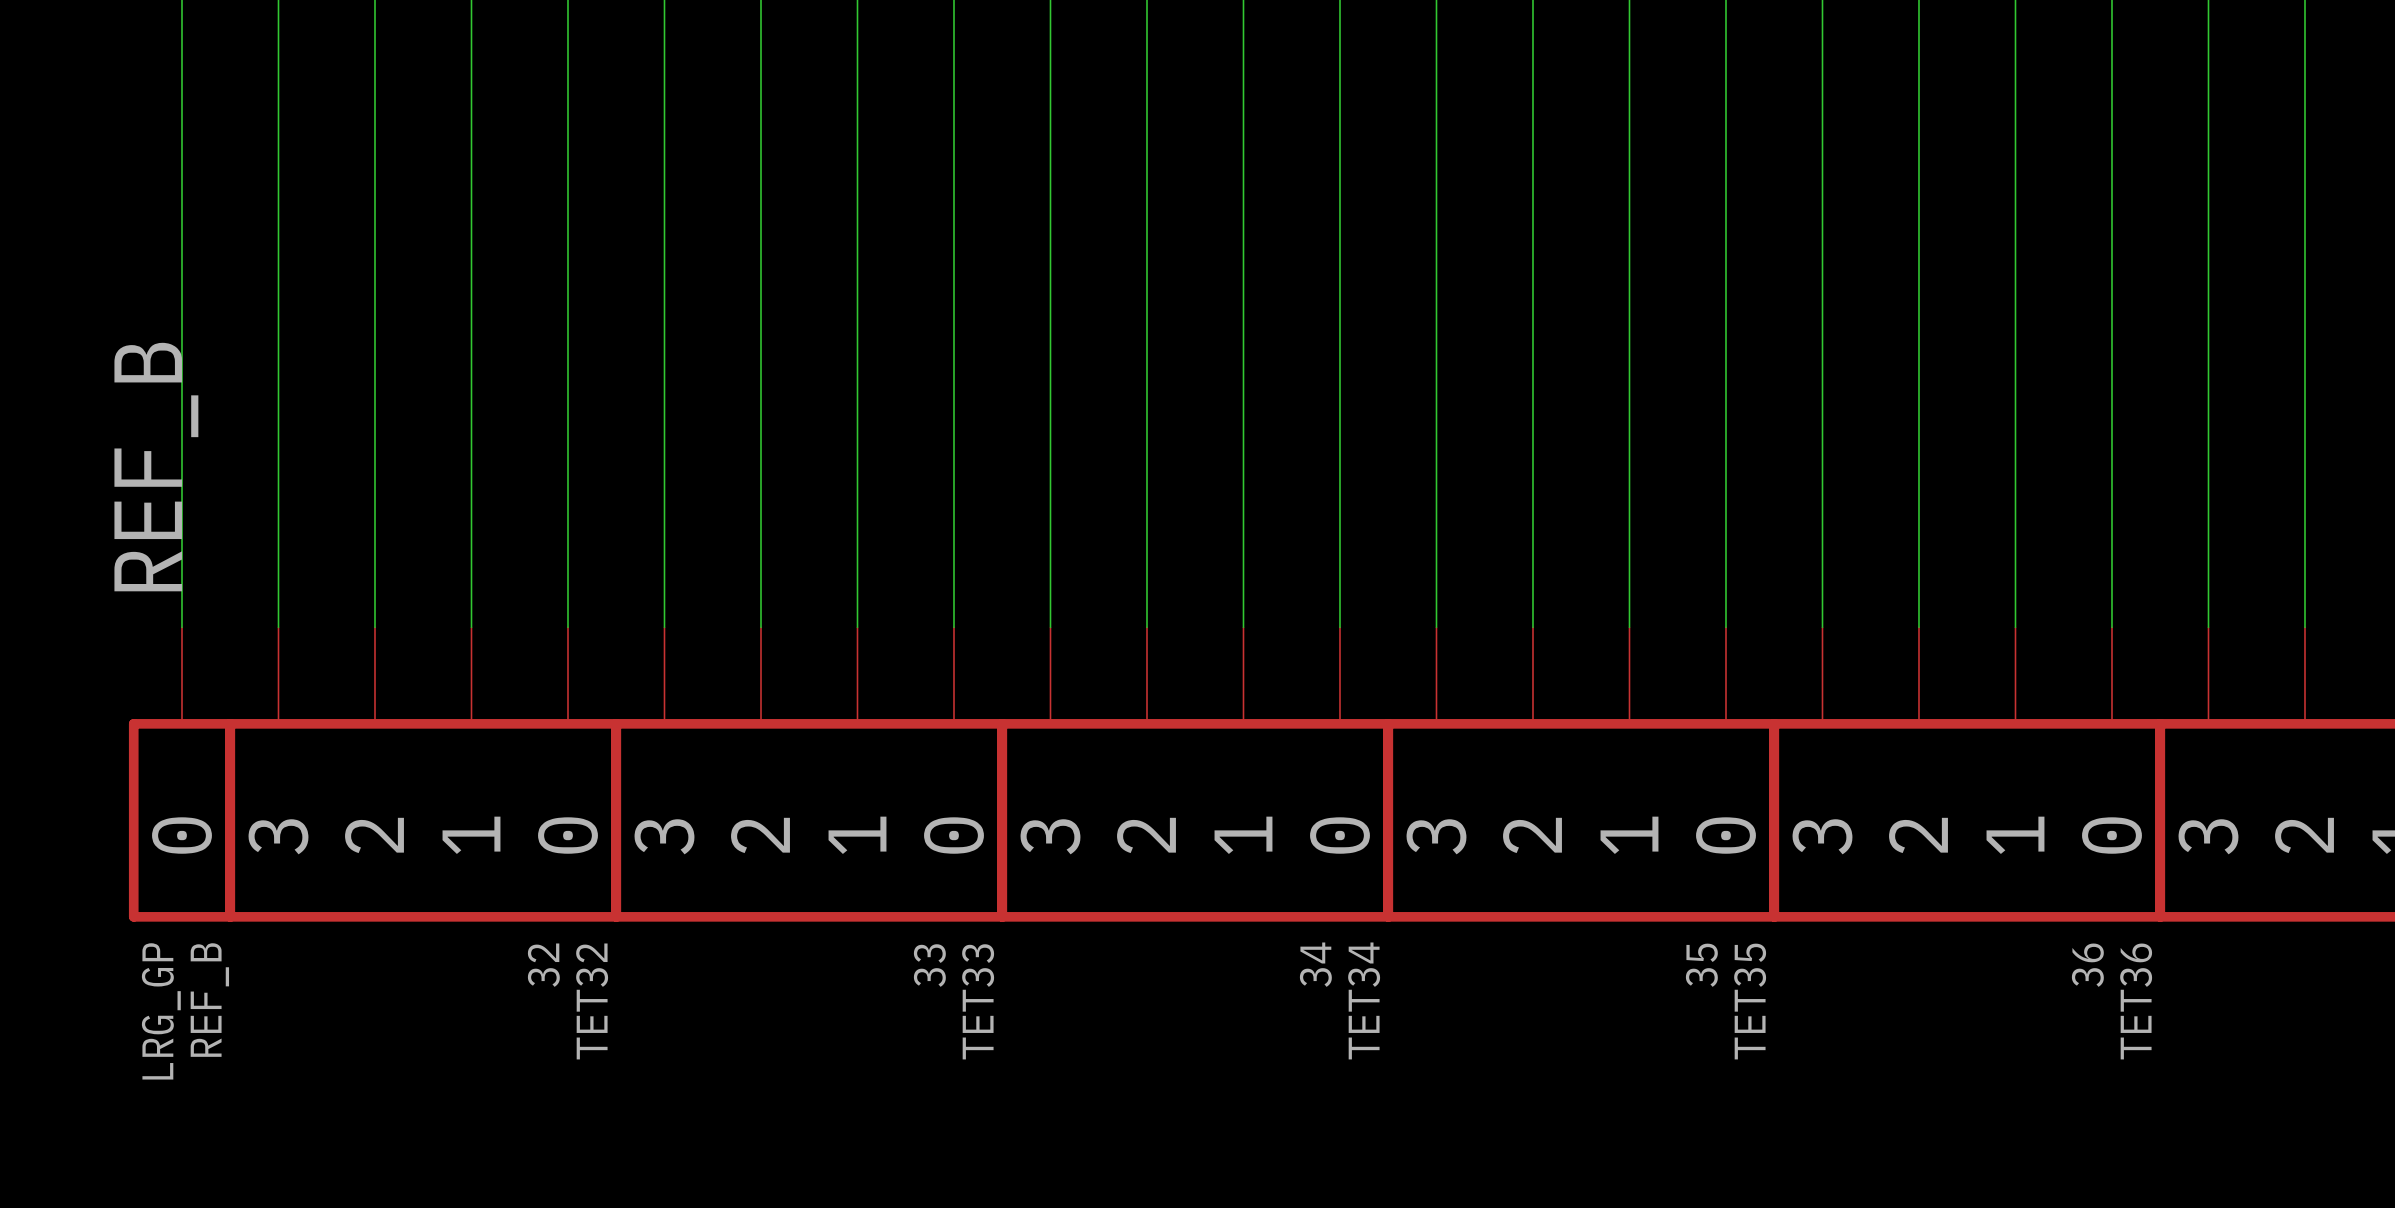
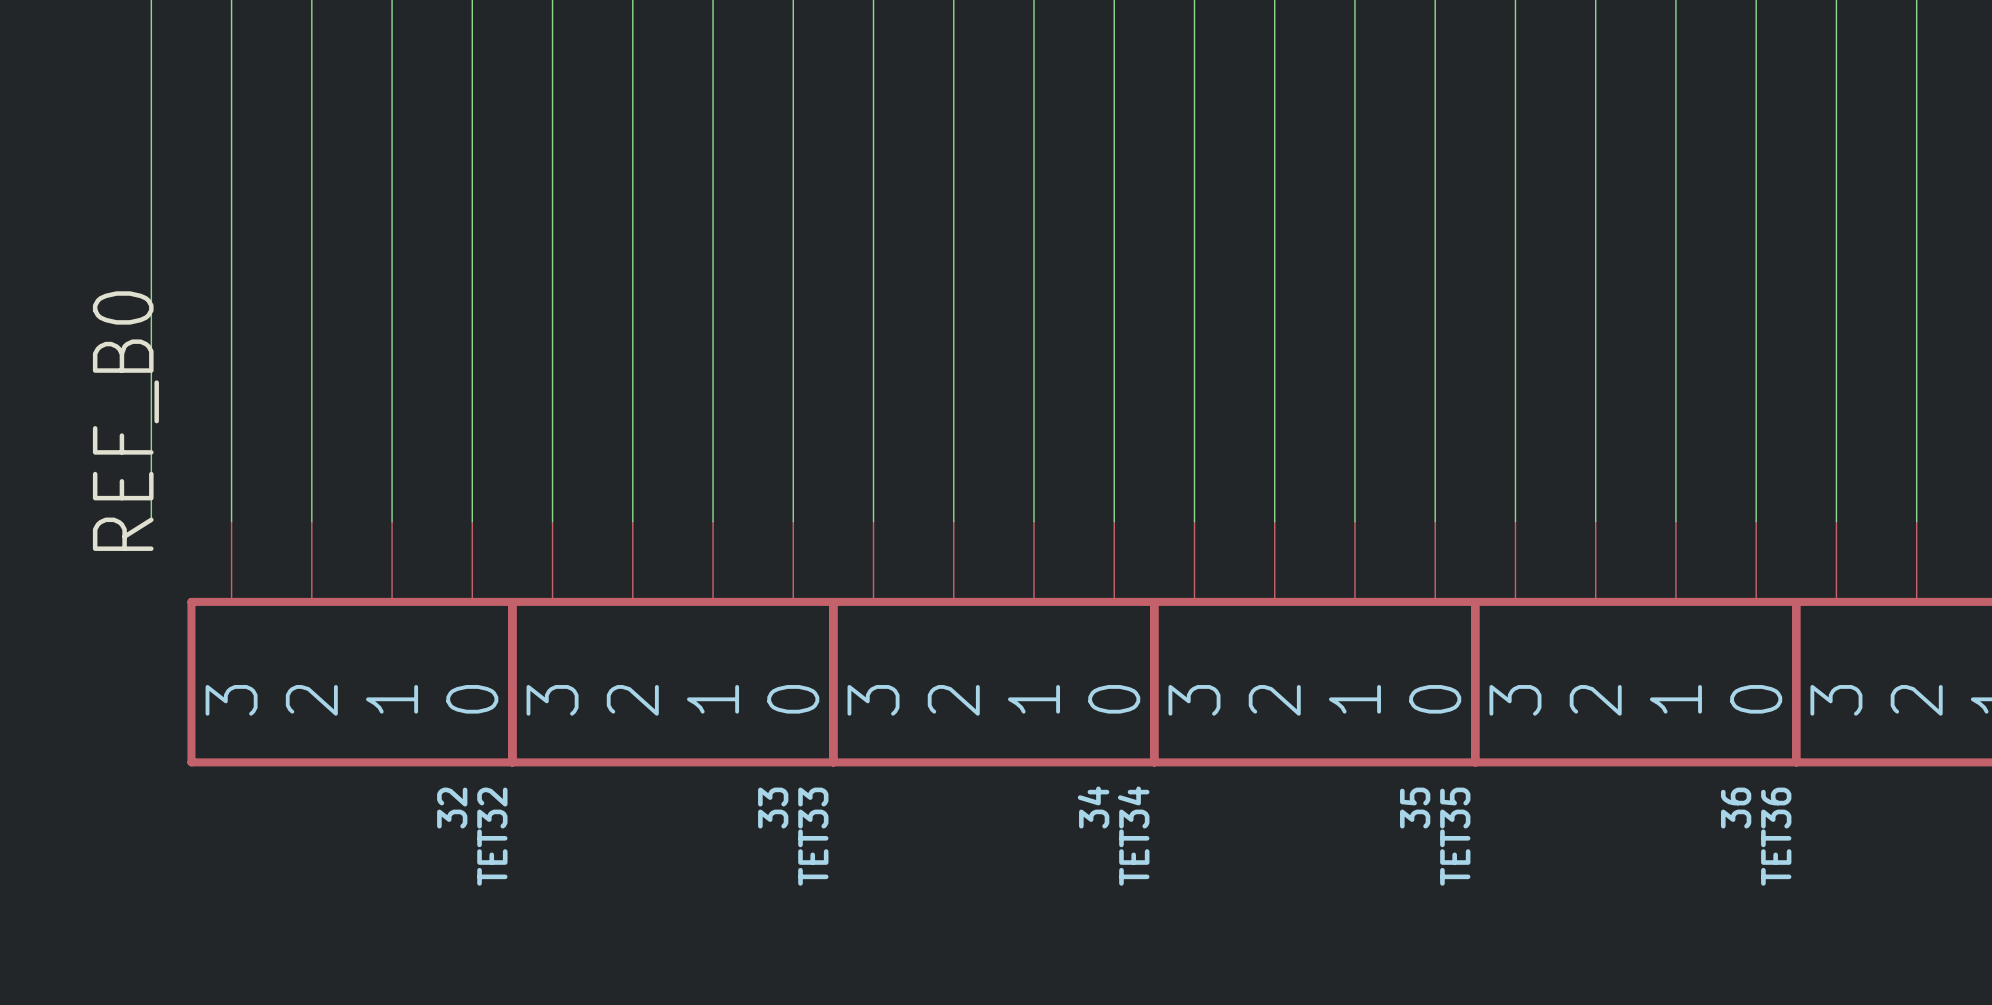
label: REF_B (156, 467) -> REF_B0 (125, 421)
REF_B: LRG_GP (181, 774) -> none

